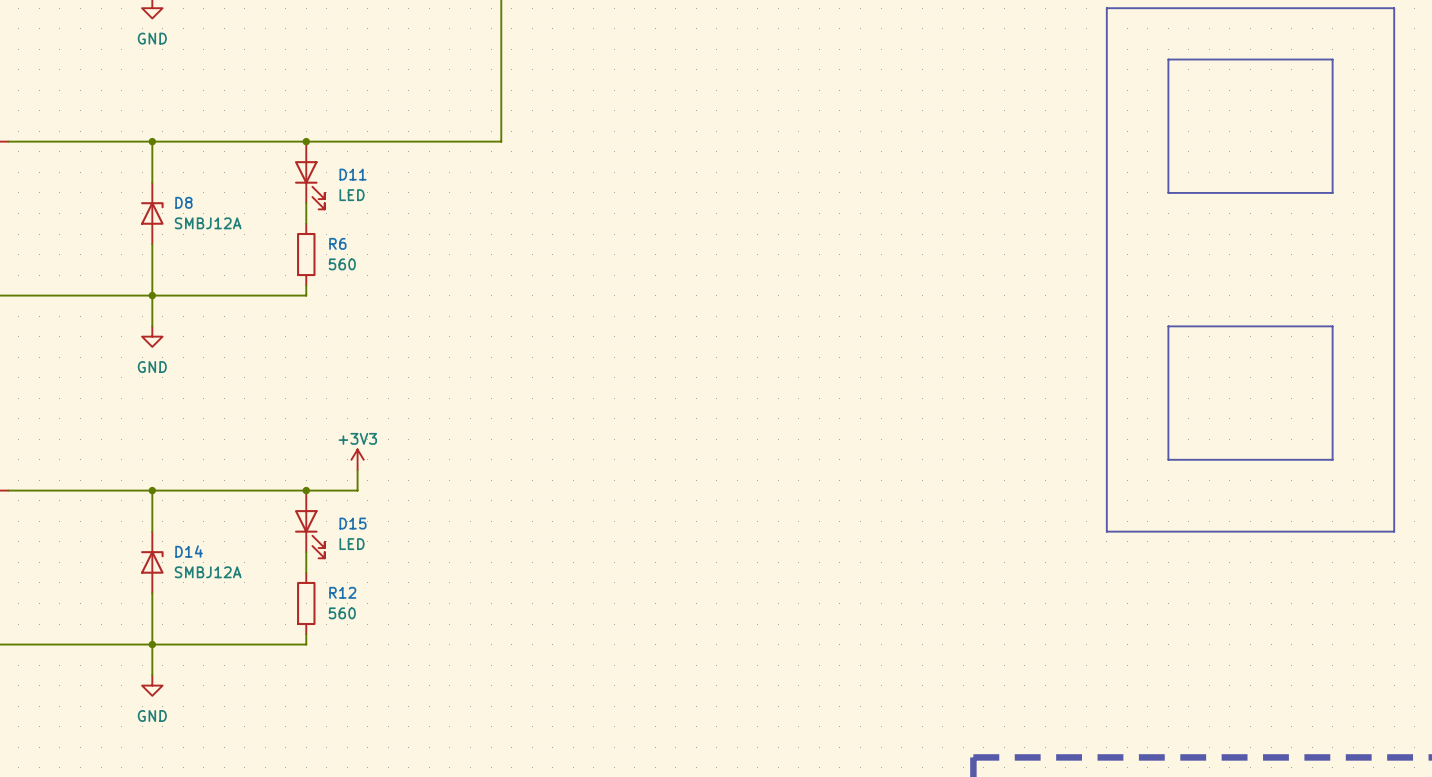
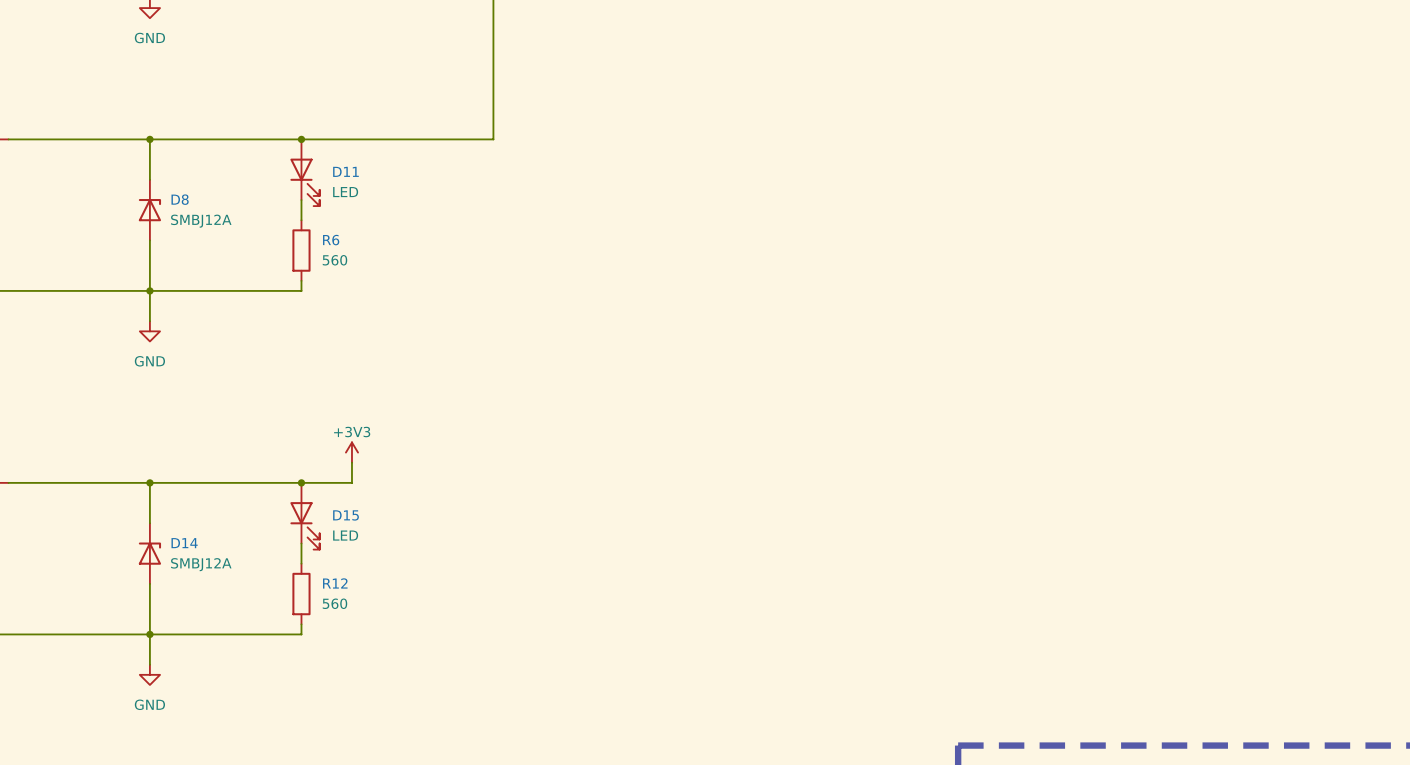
line: (1106, 8) (1106, 531) (1394, 531) (1394, 8) (1106, 8) -> none
line: (1168, 59) (1332, 59) (1332, 192) (1168, 192) (1168, 59) -> none
line: (1168, 326) (1168, 459) (1332, 459) (1332, 326) (1168, 326) -> none

